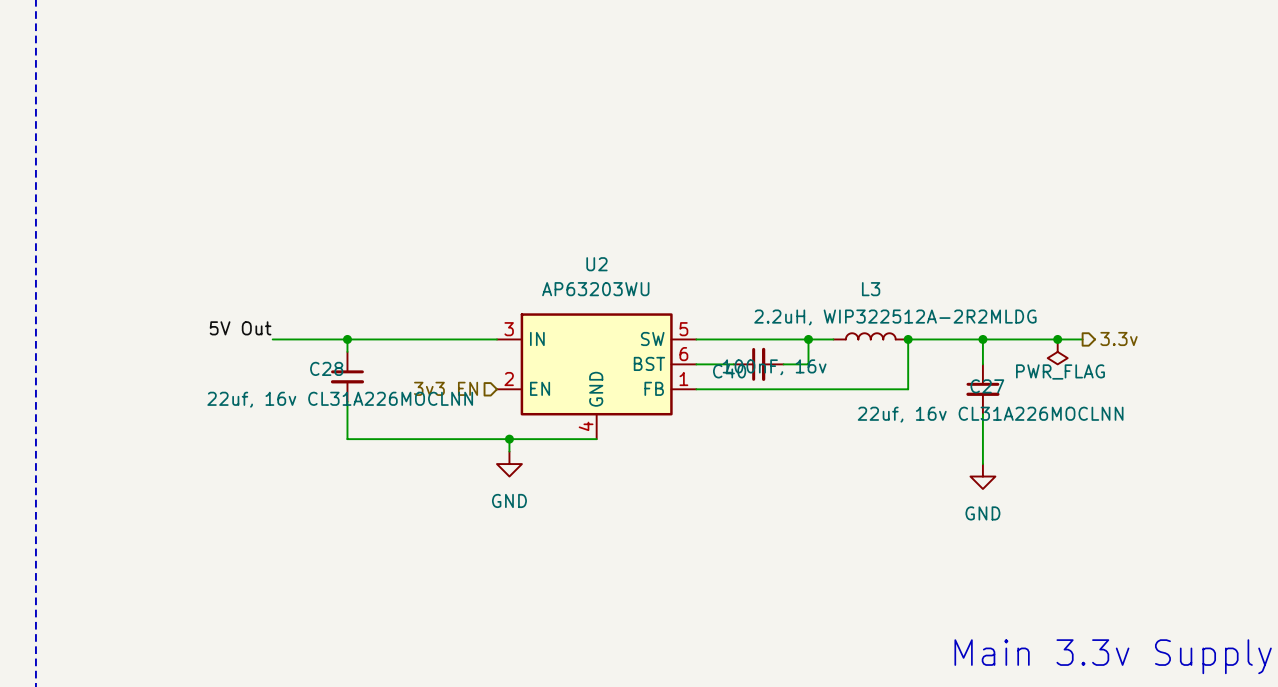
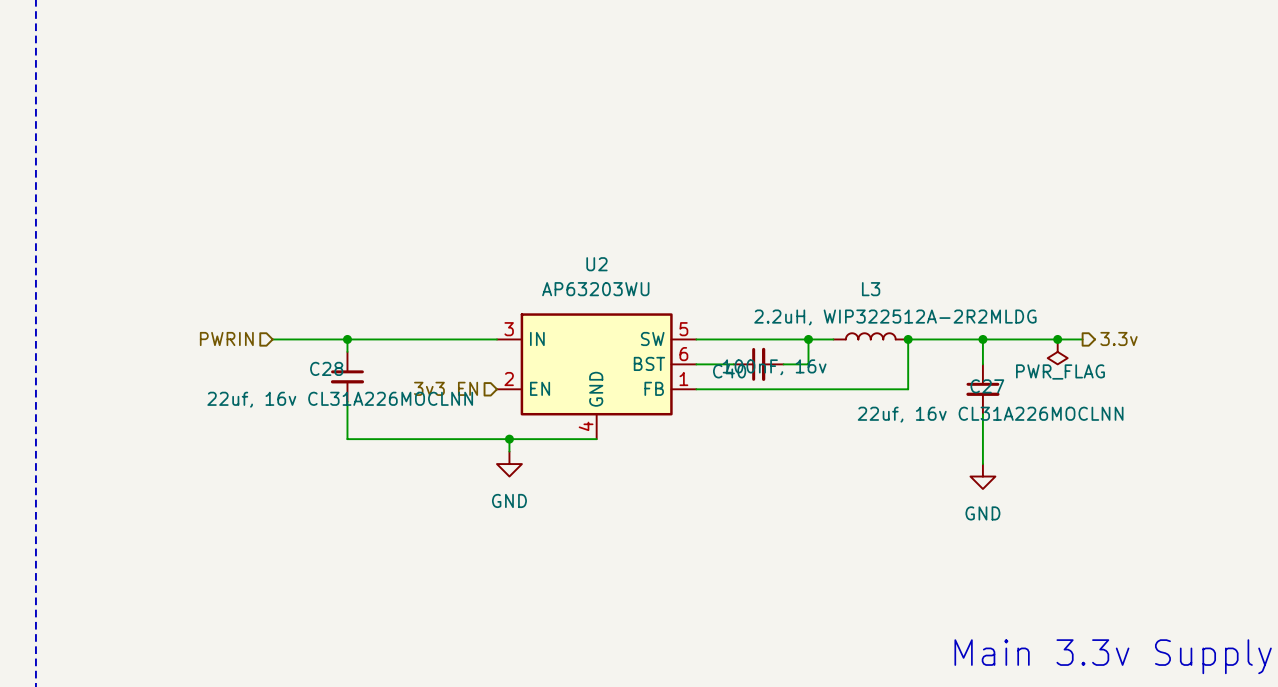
label: 5V Out (240, 328) -> none
hierarchical label: none -> PWRIN (226, 338)

